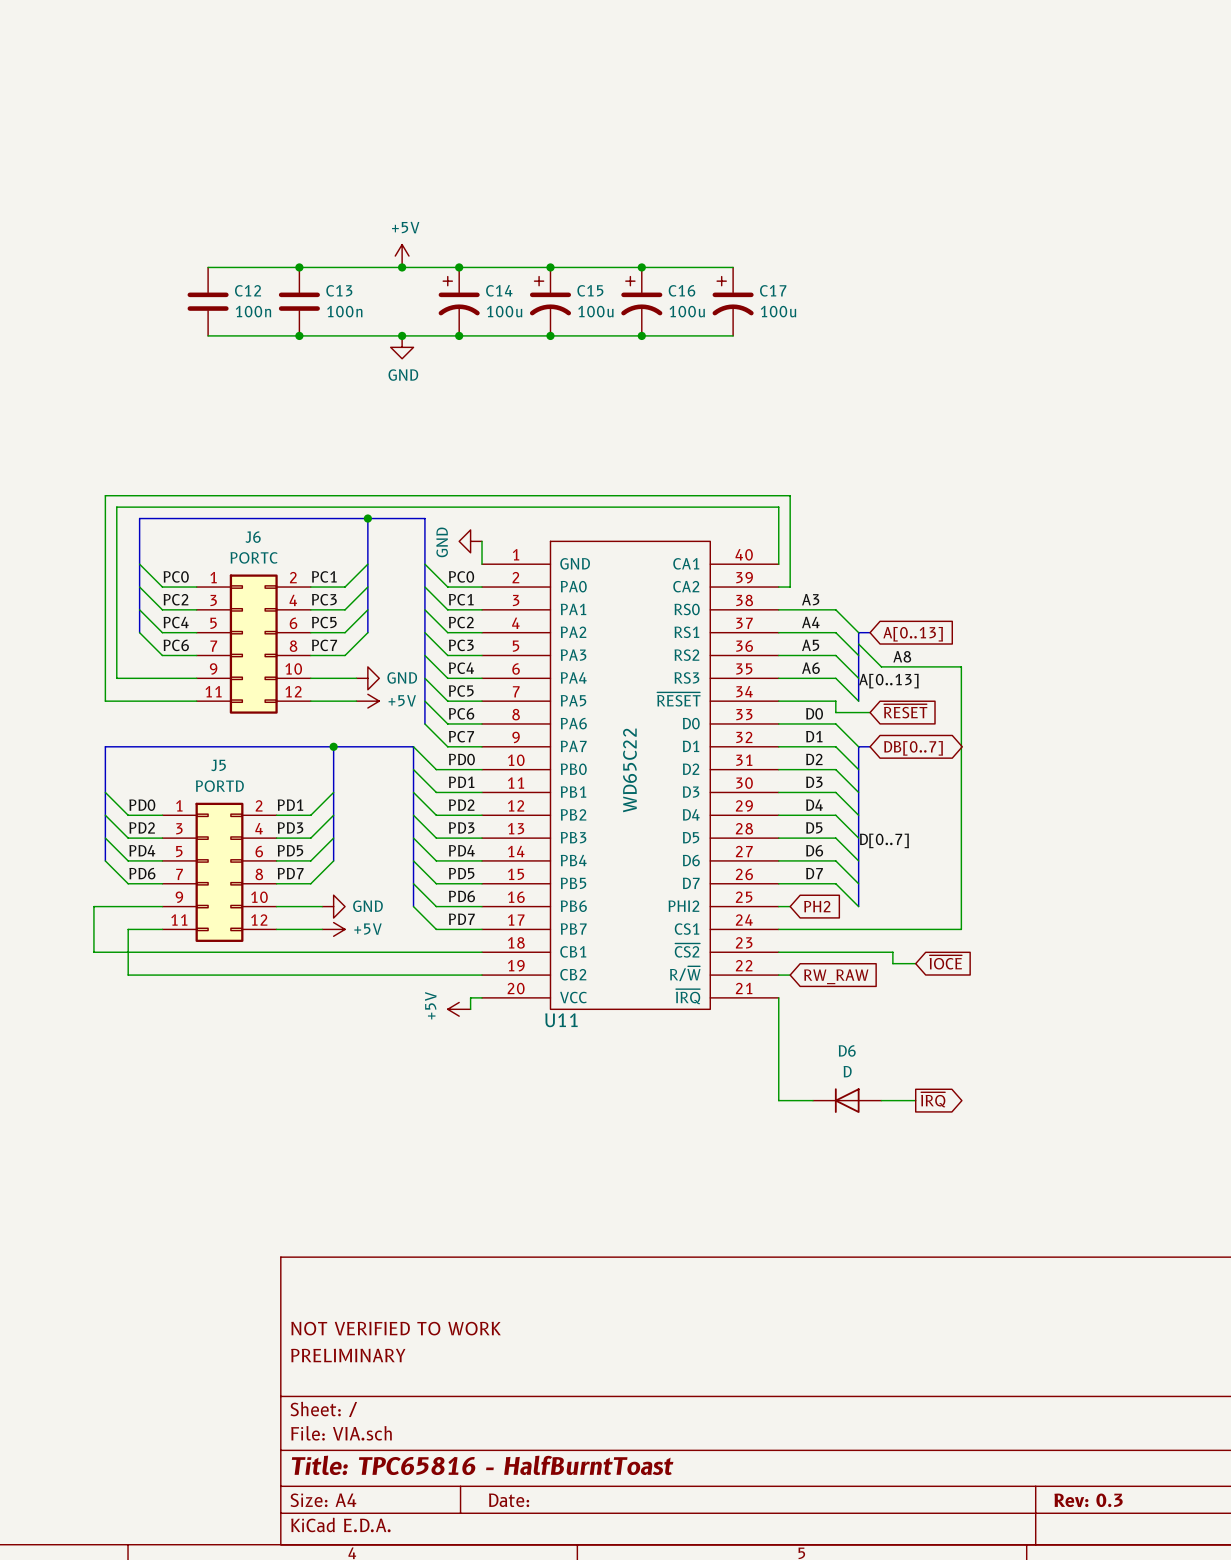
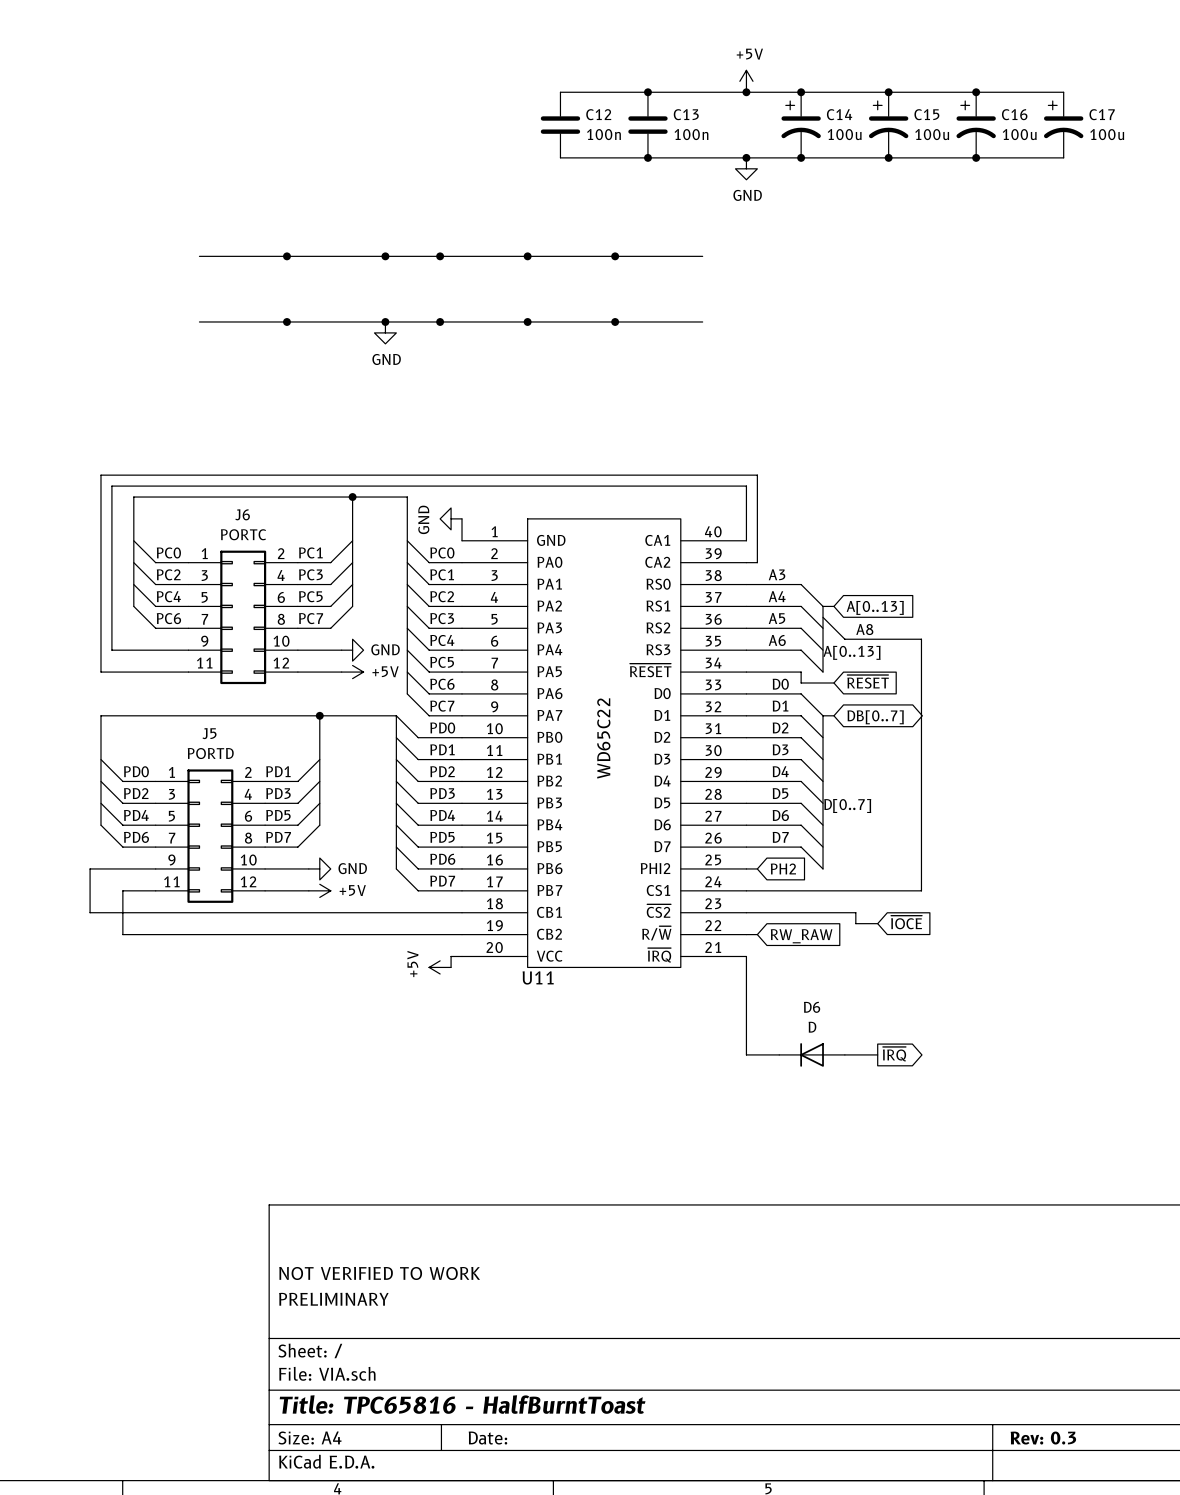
power symbol: none -> +5V (746, 81)
wire: none -> (560, 92) (1063, 92)
junction: none -> (647, 92)
junction: none -> (746, 92)
junction: none -> (801, 92)
junction: none -> (888, 92)
junction: none -> (976, 92)
wire: none -> (560, 157) (1063, 157)
junction: none -> (647, 157)
junction: none -> (746, 157)
junction: none -> (801, 157)
junction: none -> (888, 157)
junction: none -> (976, 157)
power symbol: none -> GND (746, 168)
power symbol: +5V (402, 256) -> none
C12 position: (208, 301) -> (560, 125)
C13 position: (299, 301) -> (647, 125)
C14 position: (459, 301) -> (801, 125)
C15 position: (550, 301) -> (888, 125)
C16 position: (641, 301) -> (976, 125)
C17 position: (733, 301) -> (1063, 125)

